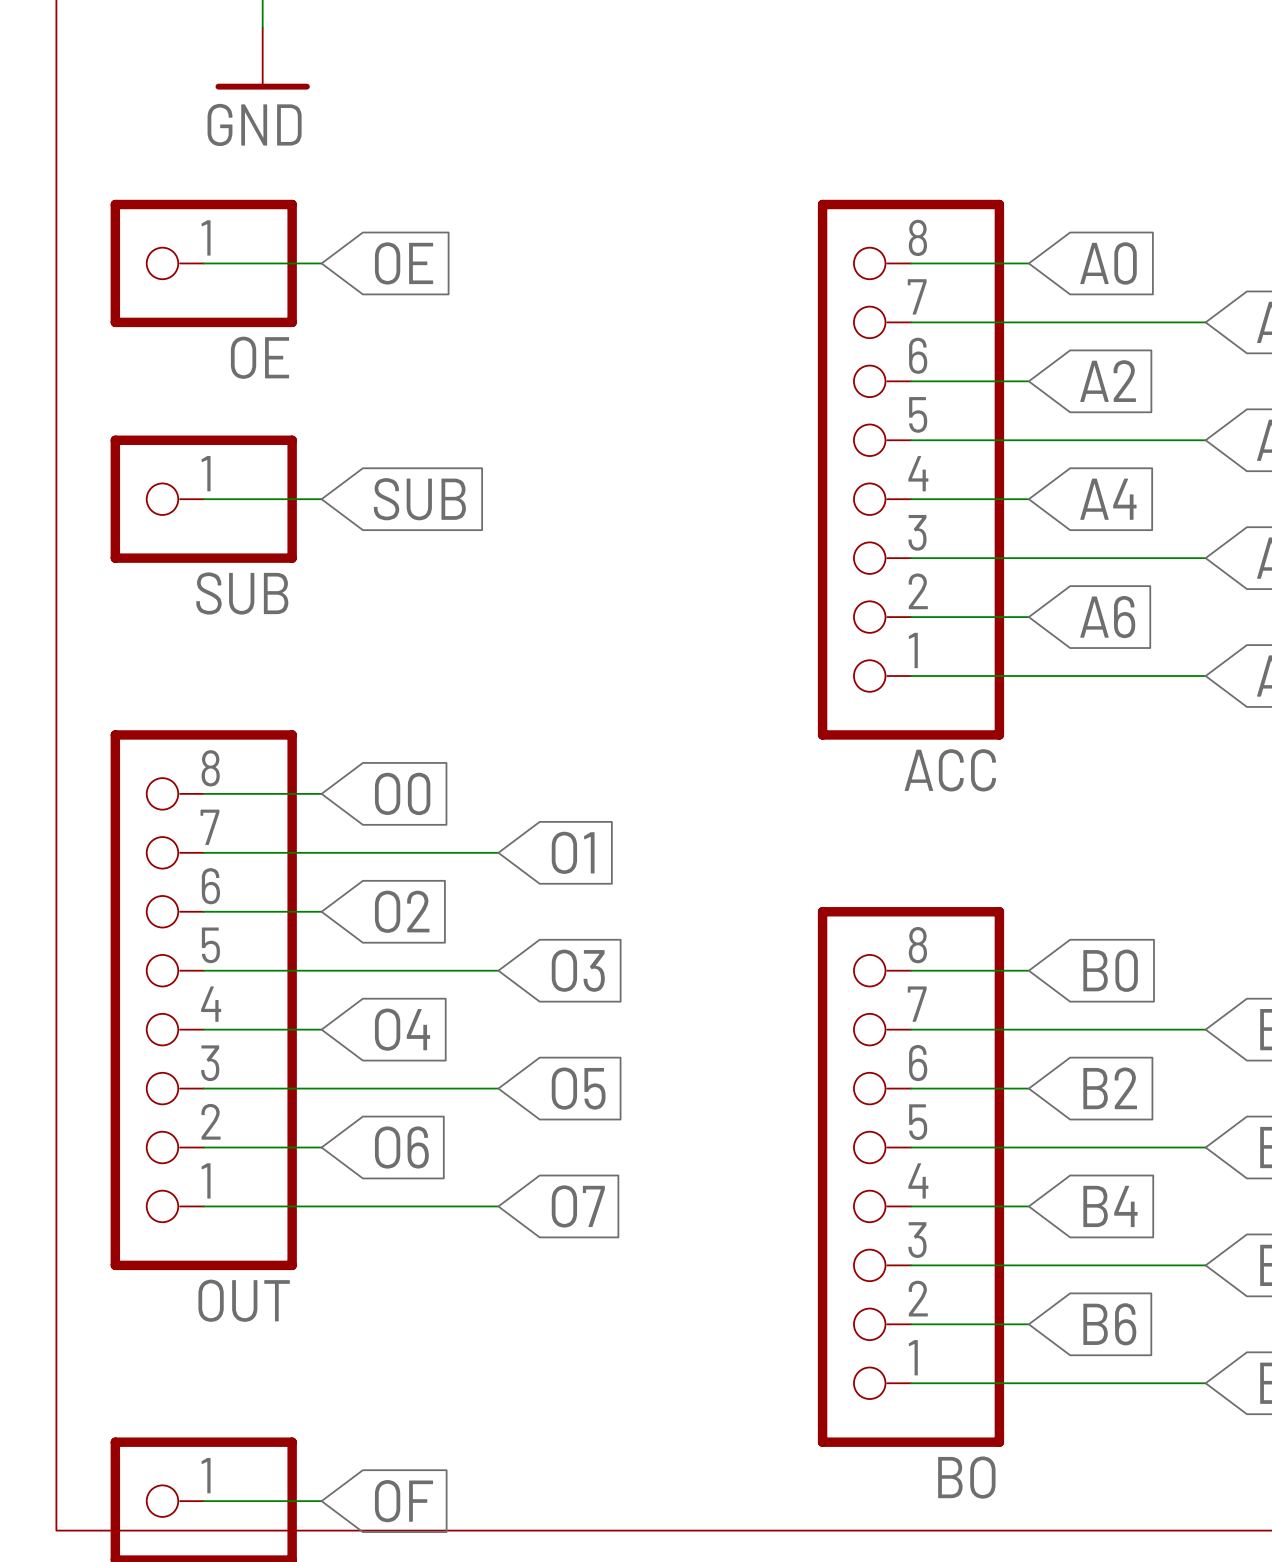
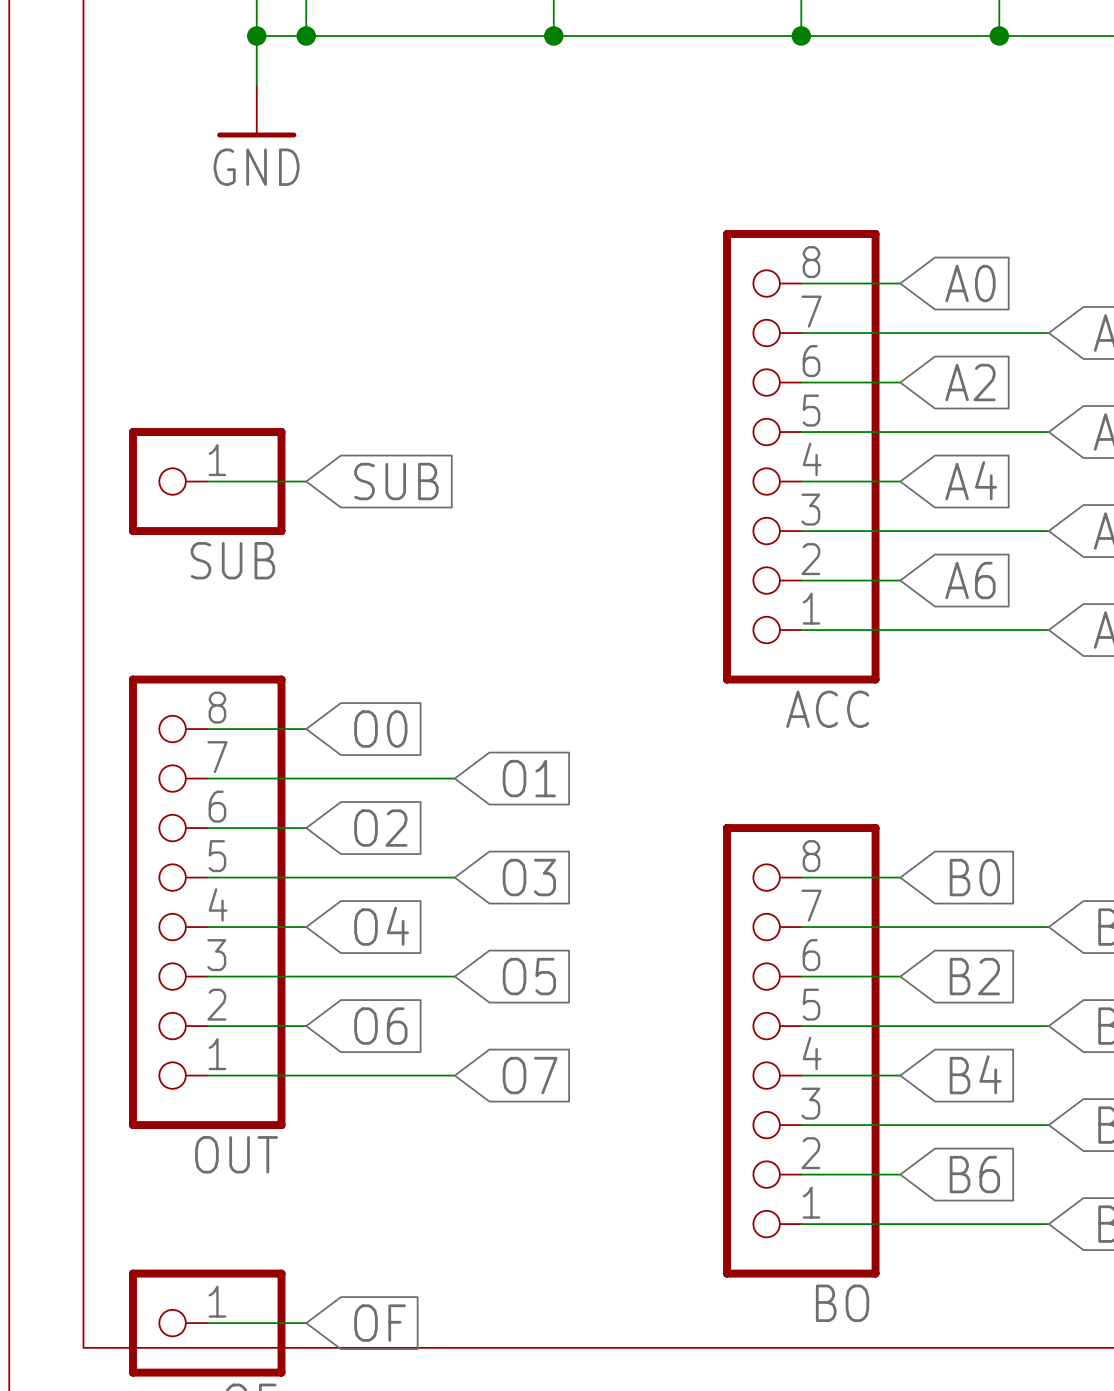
wire: (203, 263) (321, 263) -> none
OE: (203, 263) -> none
global label: OE (404, 263) -> none

